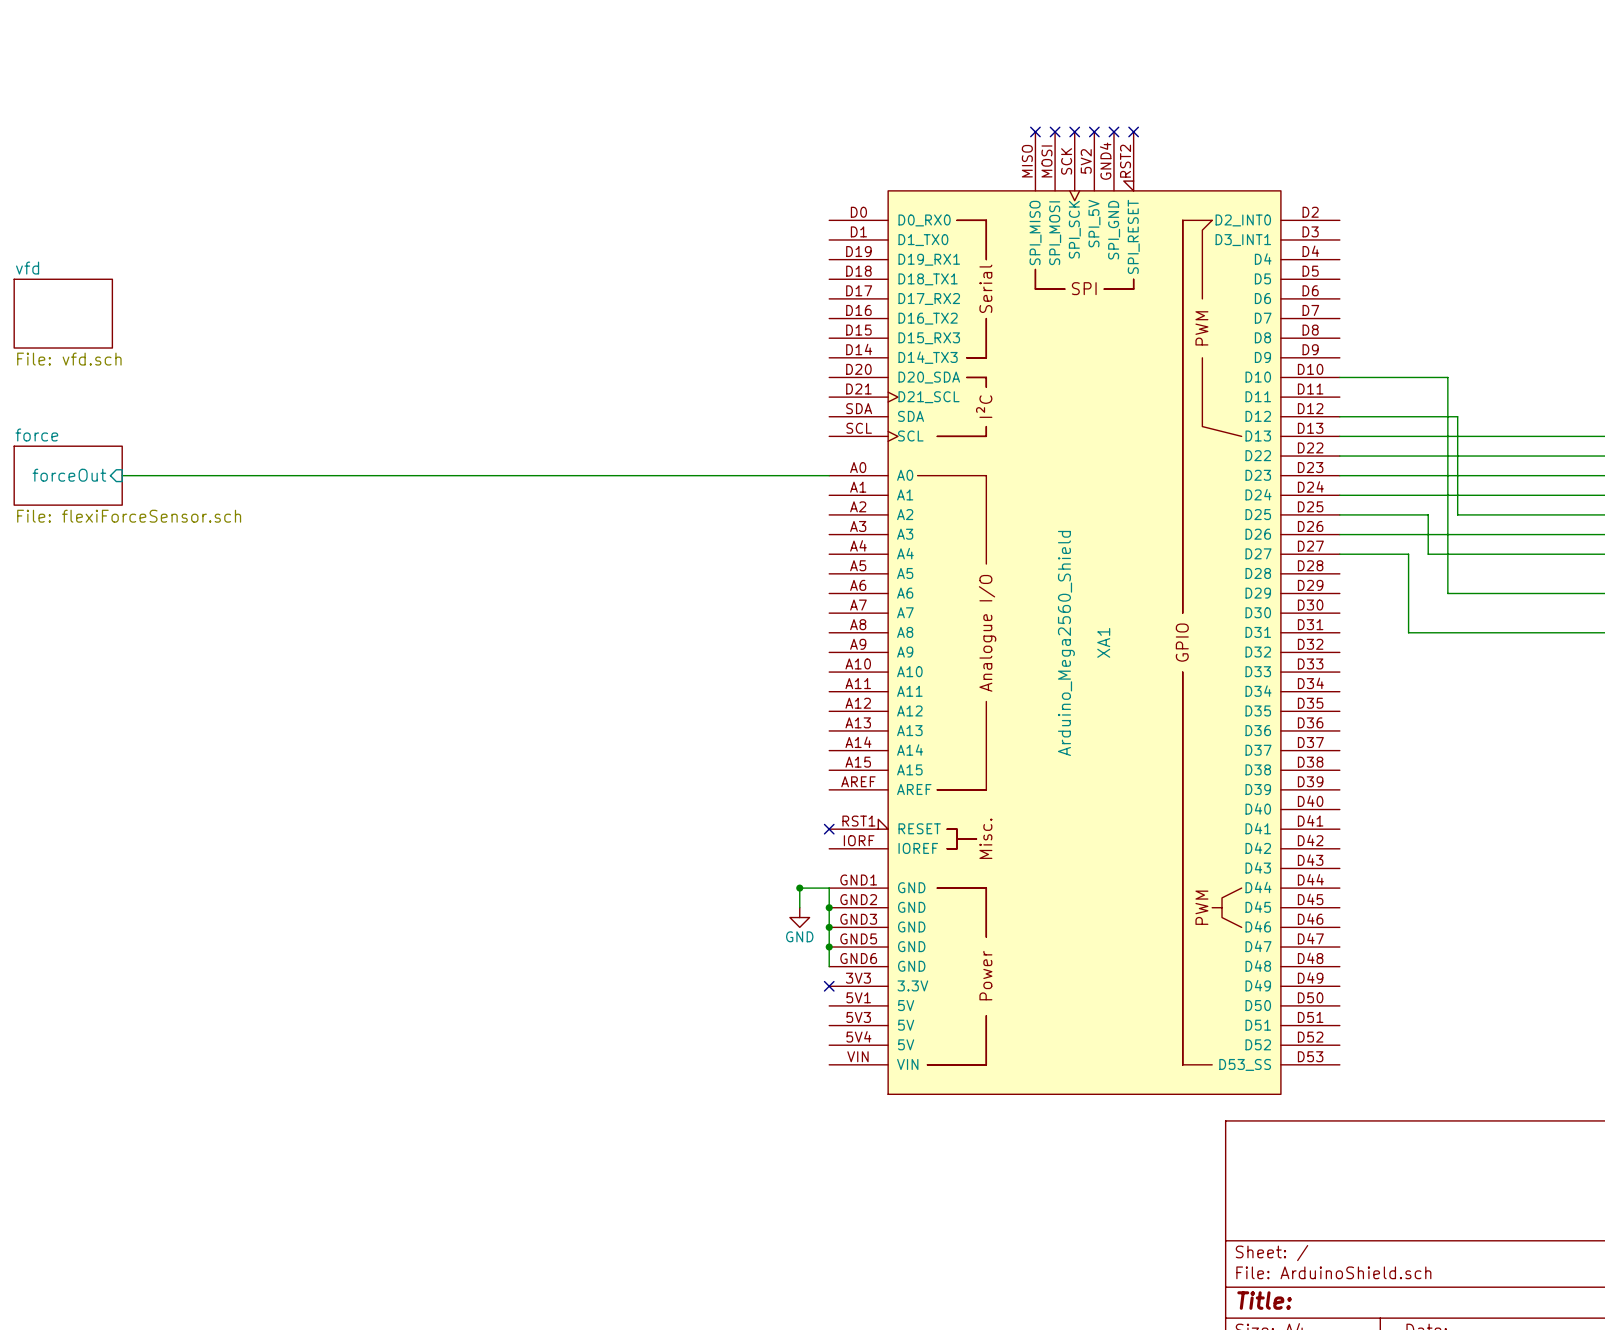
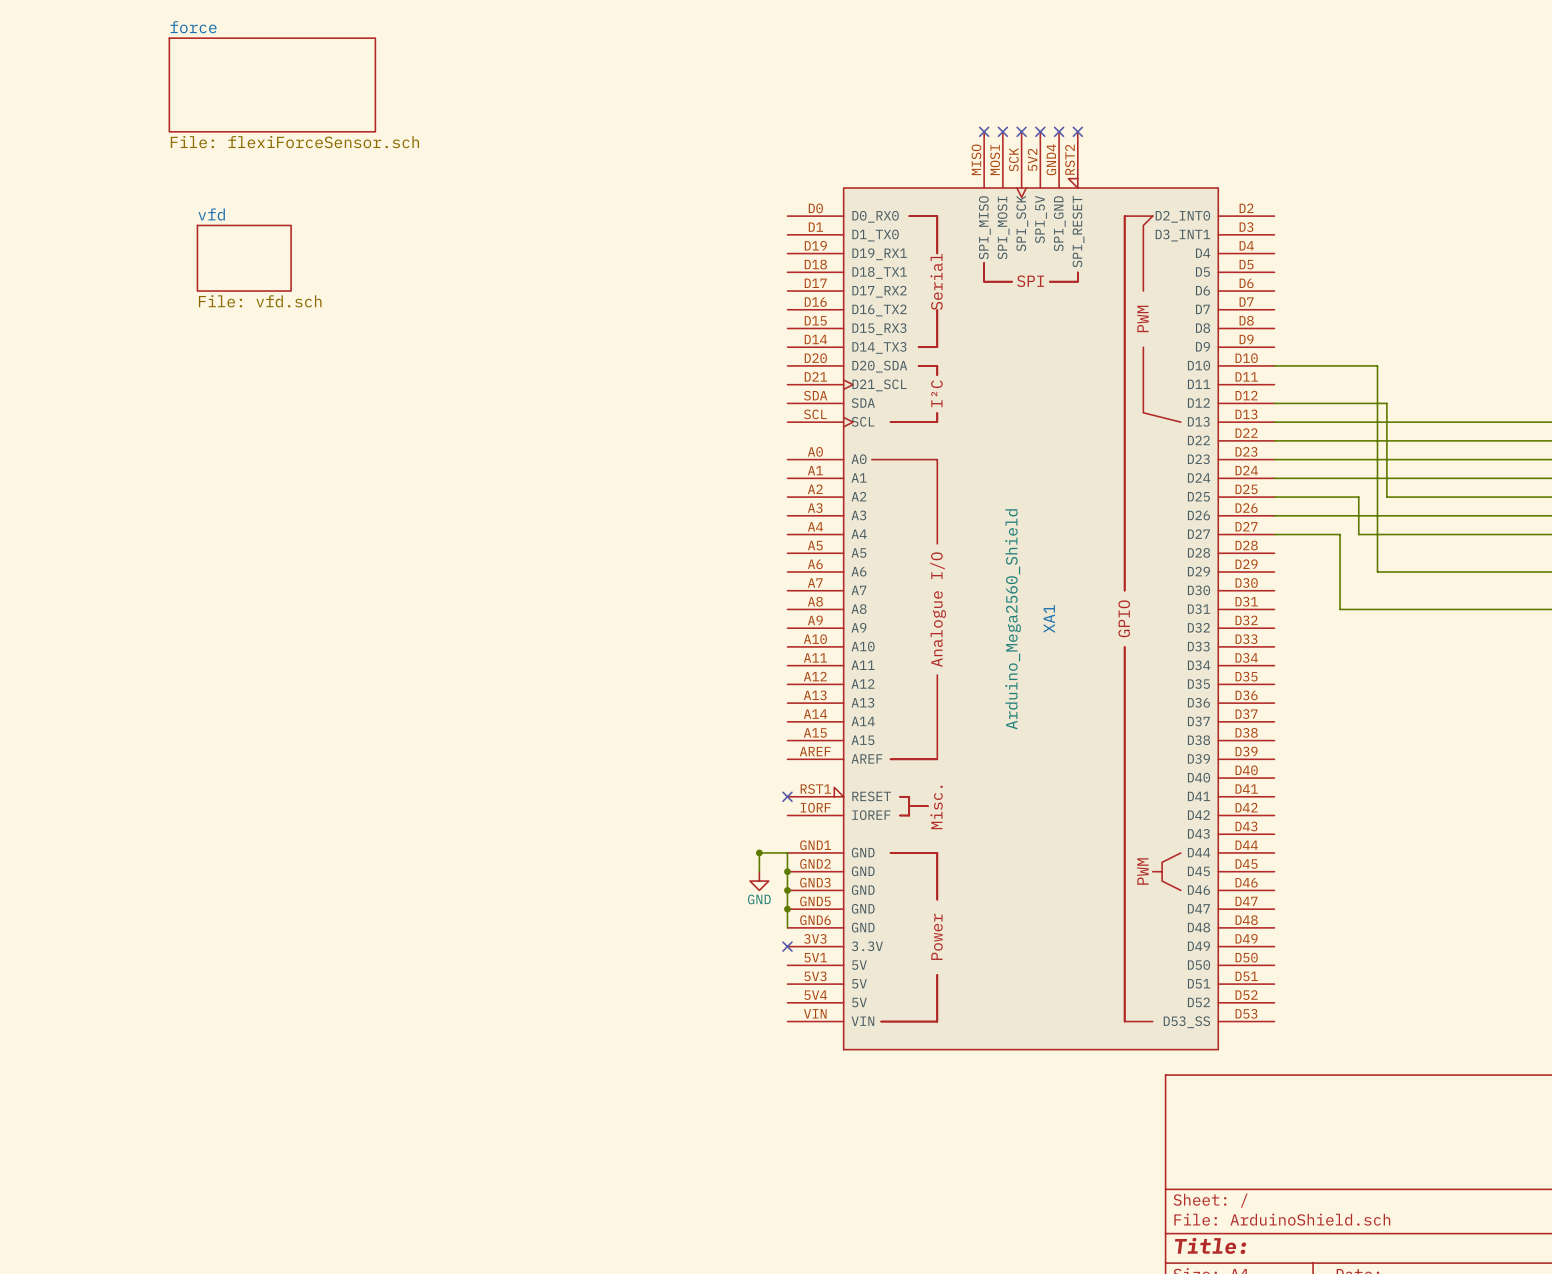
sheet force: none -> File: flexiForceSensor.sch (272, 84)
sheet vfd: none -> File: vfd.sch (244, 258)
sheet vfd: File: vfd.sch (63, 313) -> none
sheet force: File: flexiForceSensor.sch (68, 475) -> none
sheet pin: forceOut (69, 475) -> none
wire: (122, 475) (829, 475) -> none

